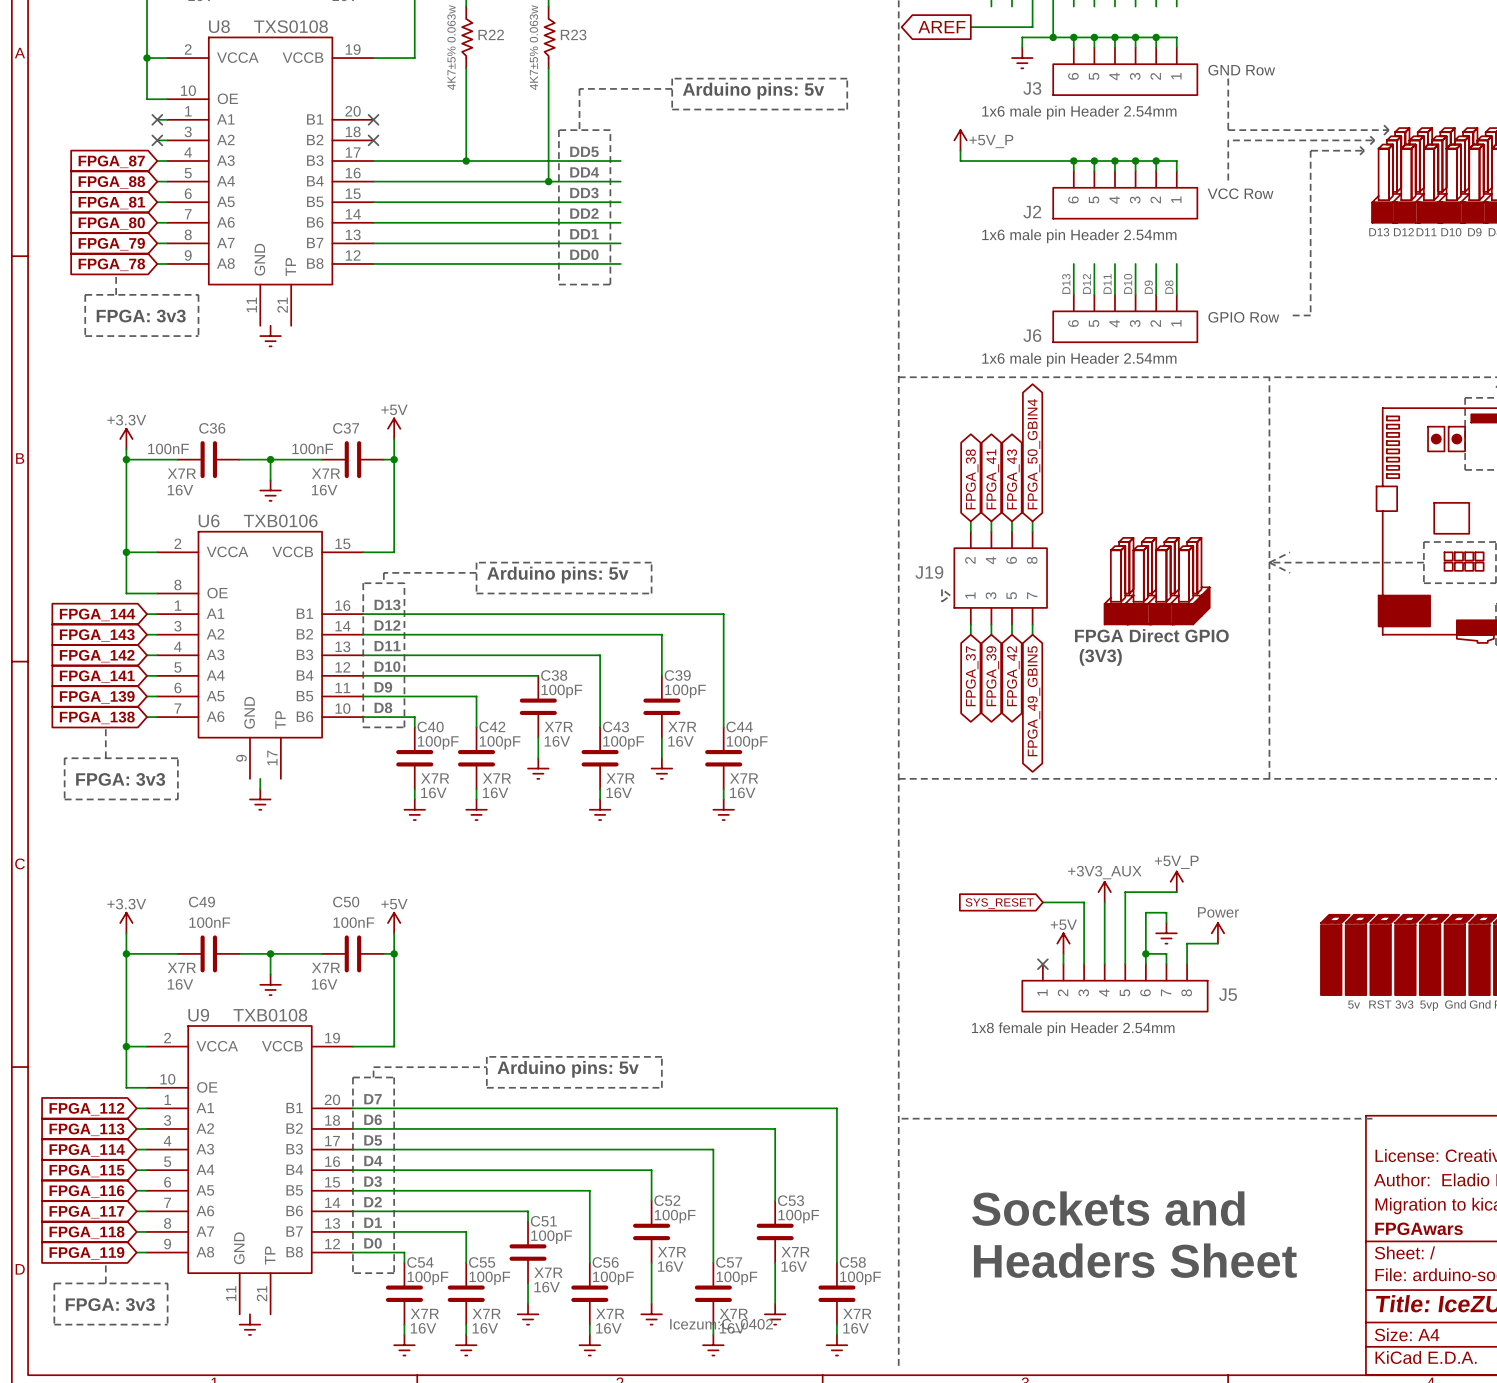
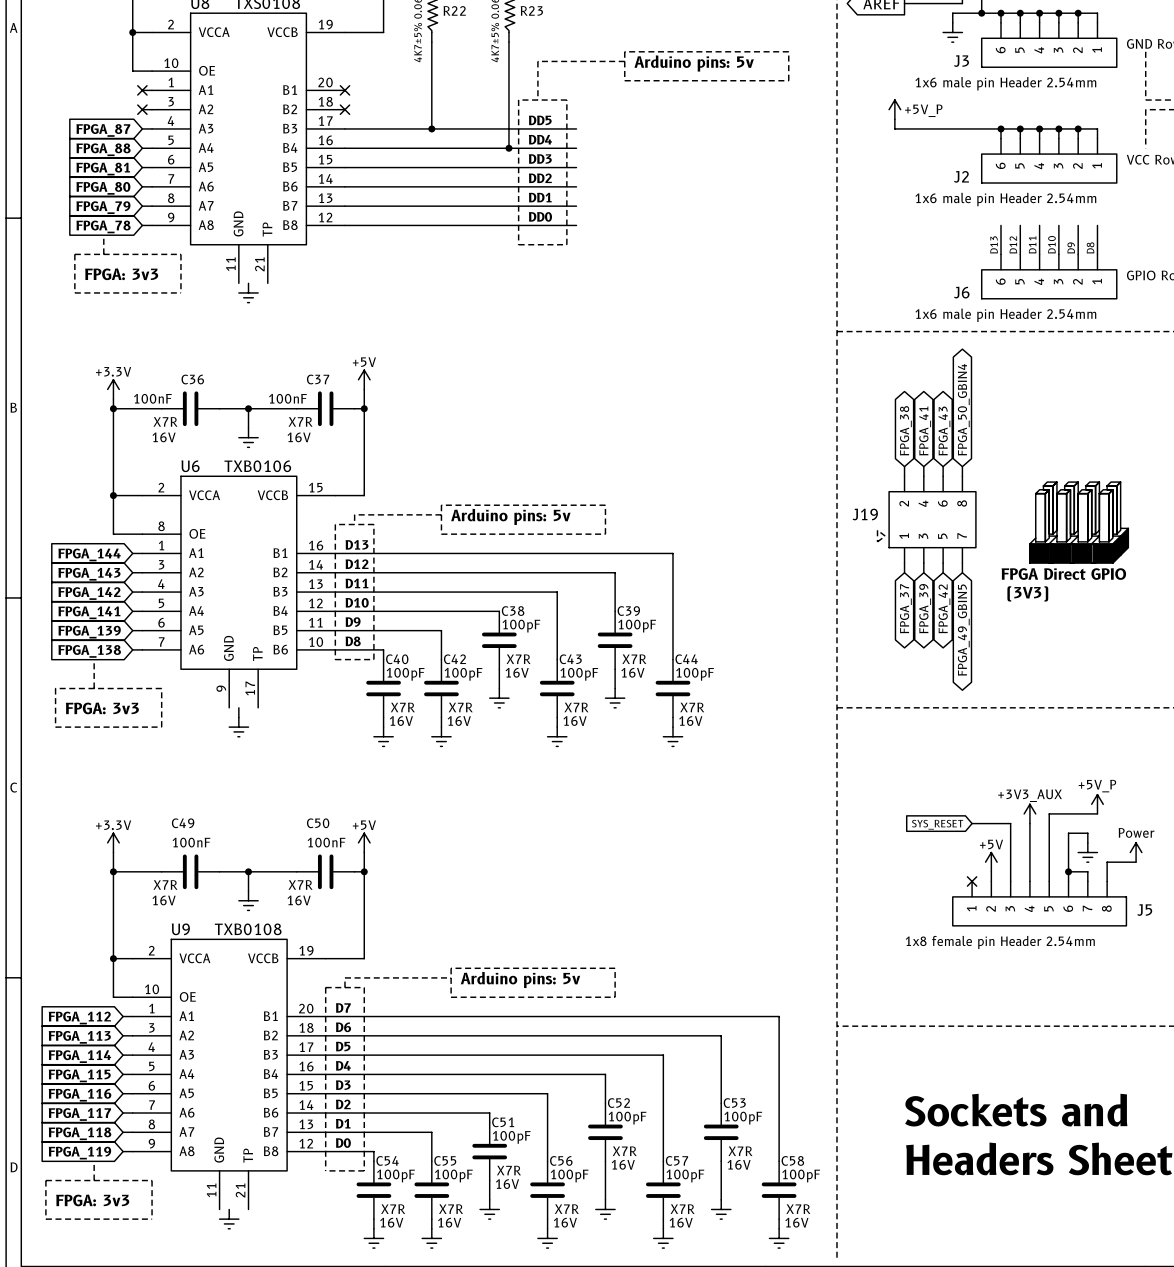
C57 text: Icezum:C_0402 (721, 1325) -> none

